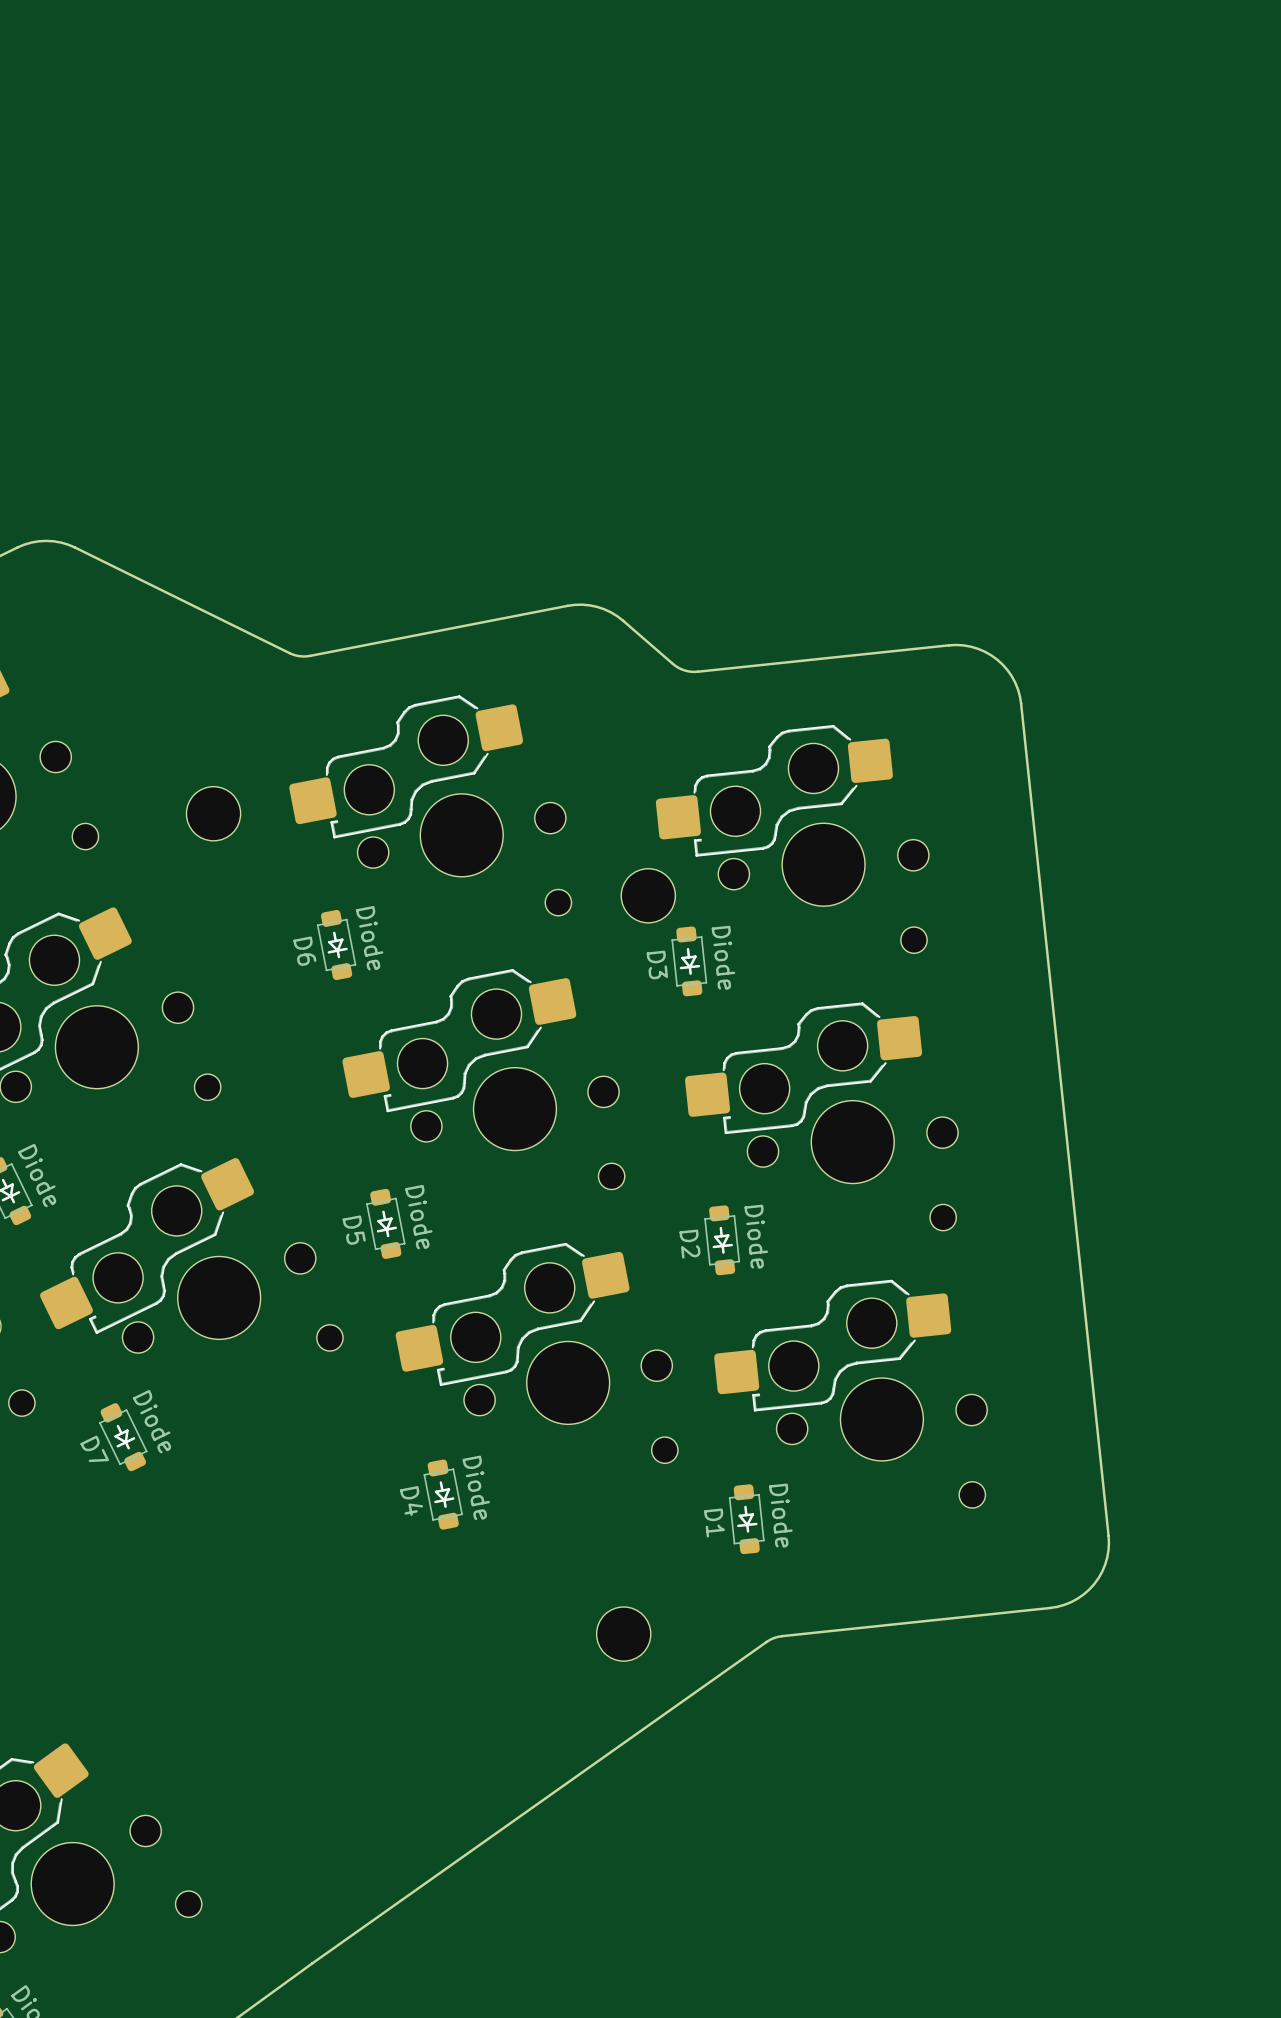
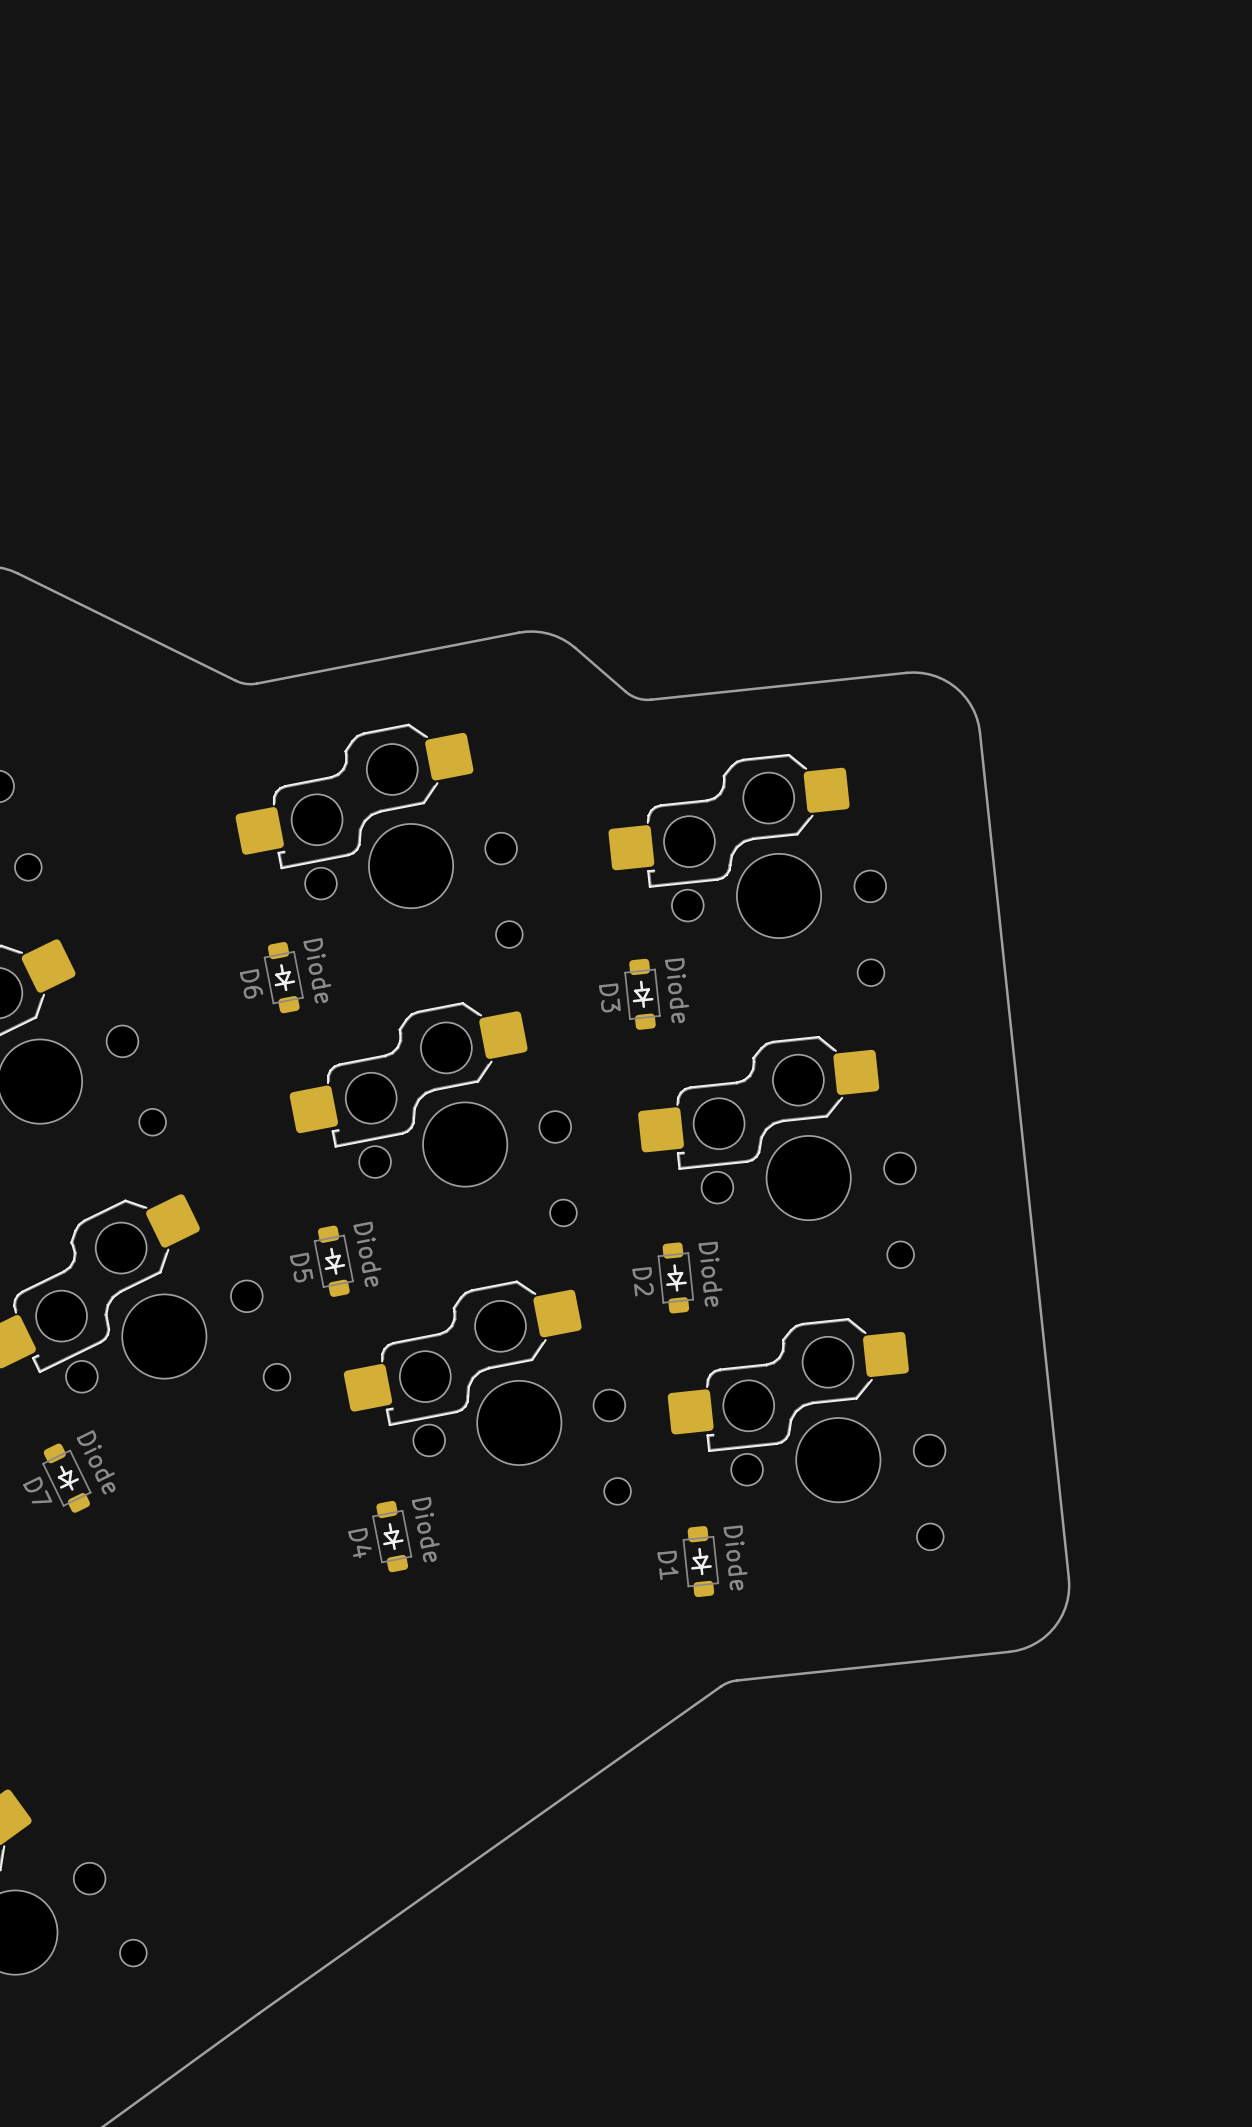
part: (213, 813) -> none
part: (648, 895) -> none
part: (623, 1634) -> none

